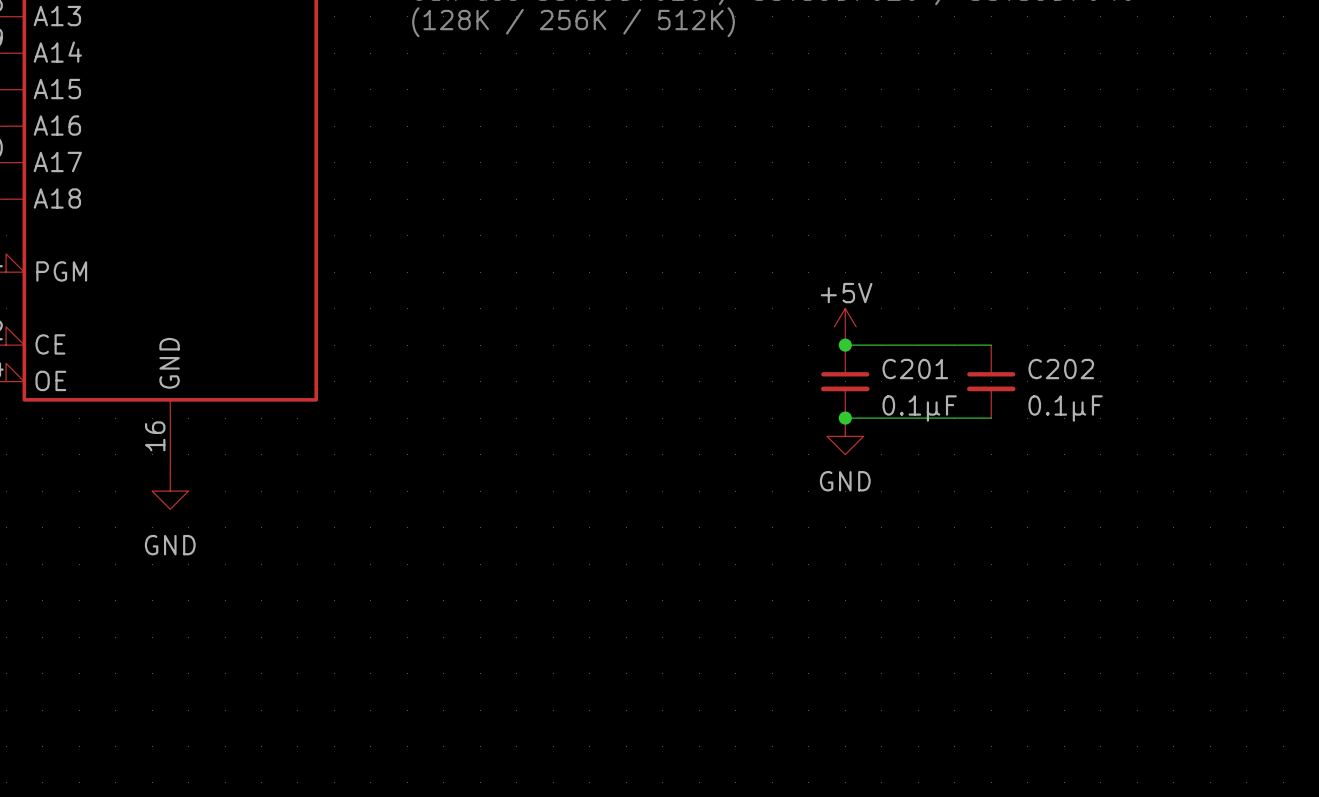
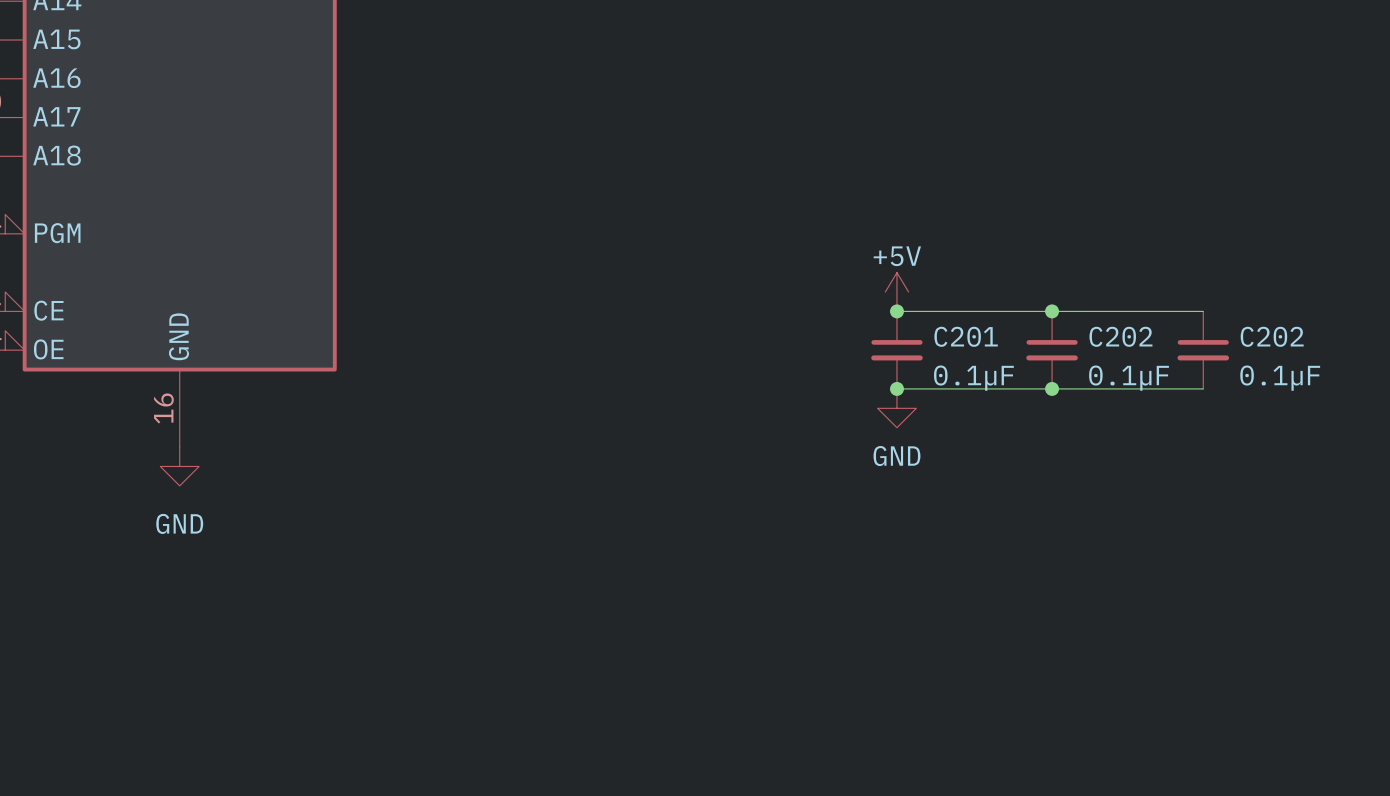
wire: none -> (1052, 311) (1203, 311)
junction: none -> (1052, 311)
C202: none -> 0.1µF (1203, 350)
wire: none -> (1052, 388) (1203, 388)
junction: none -> (1052, 388)

